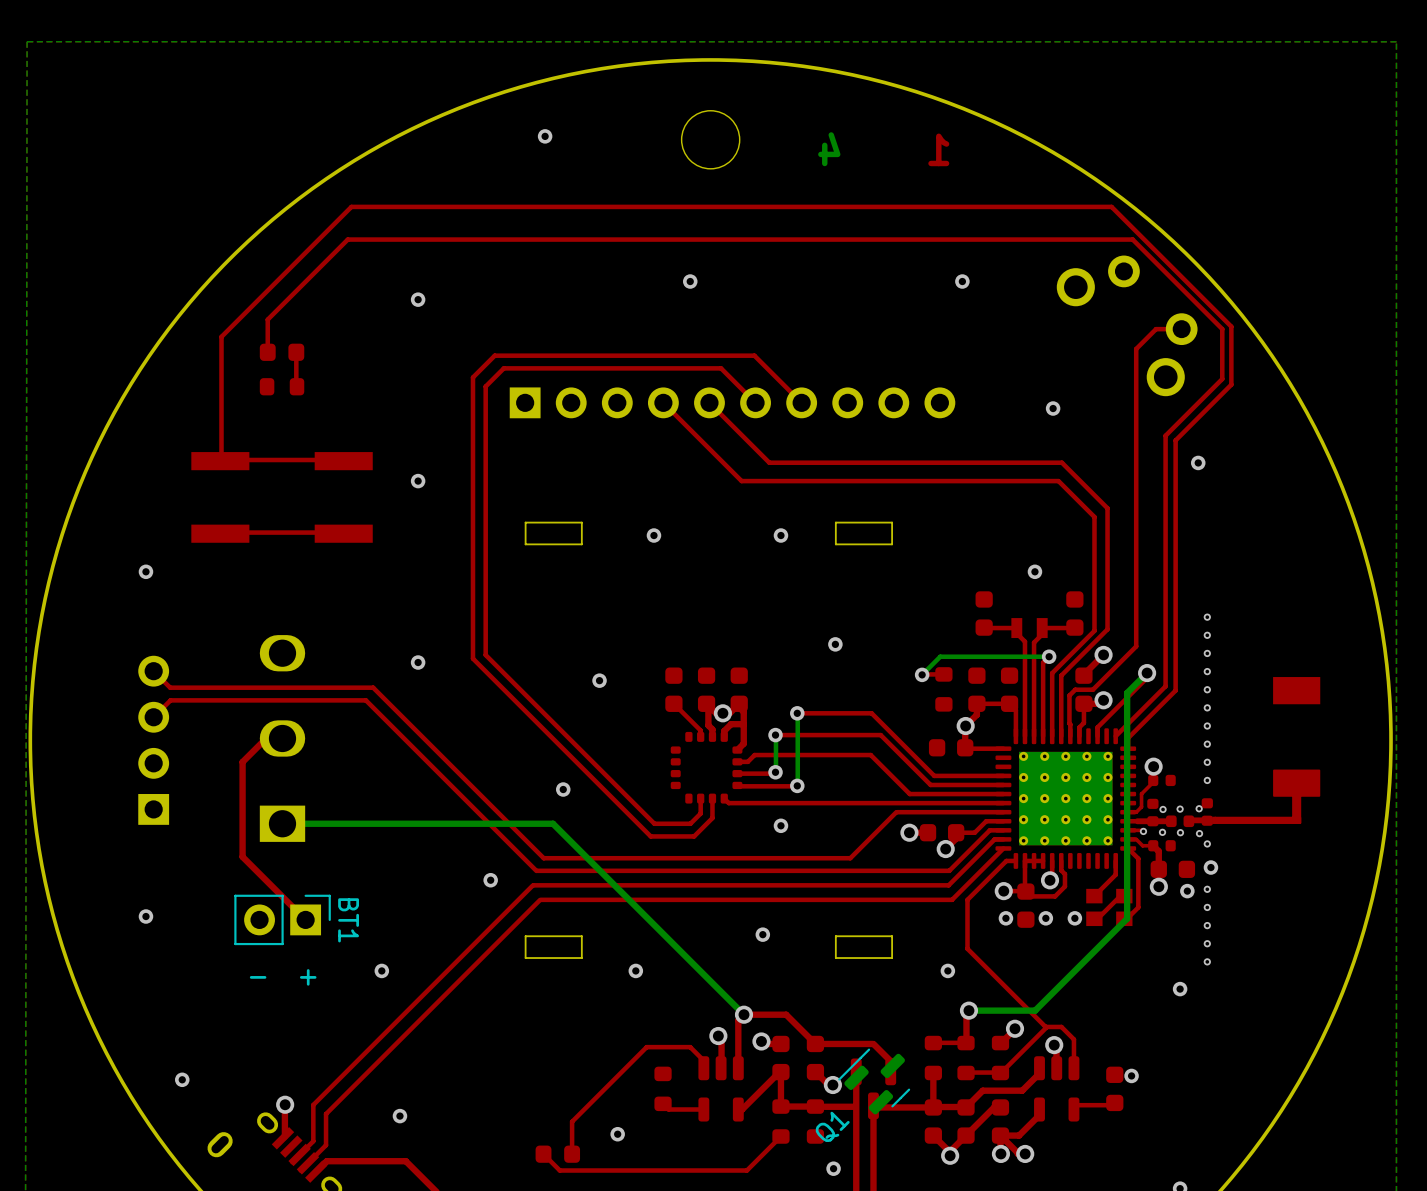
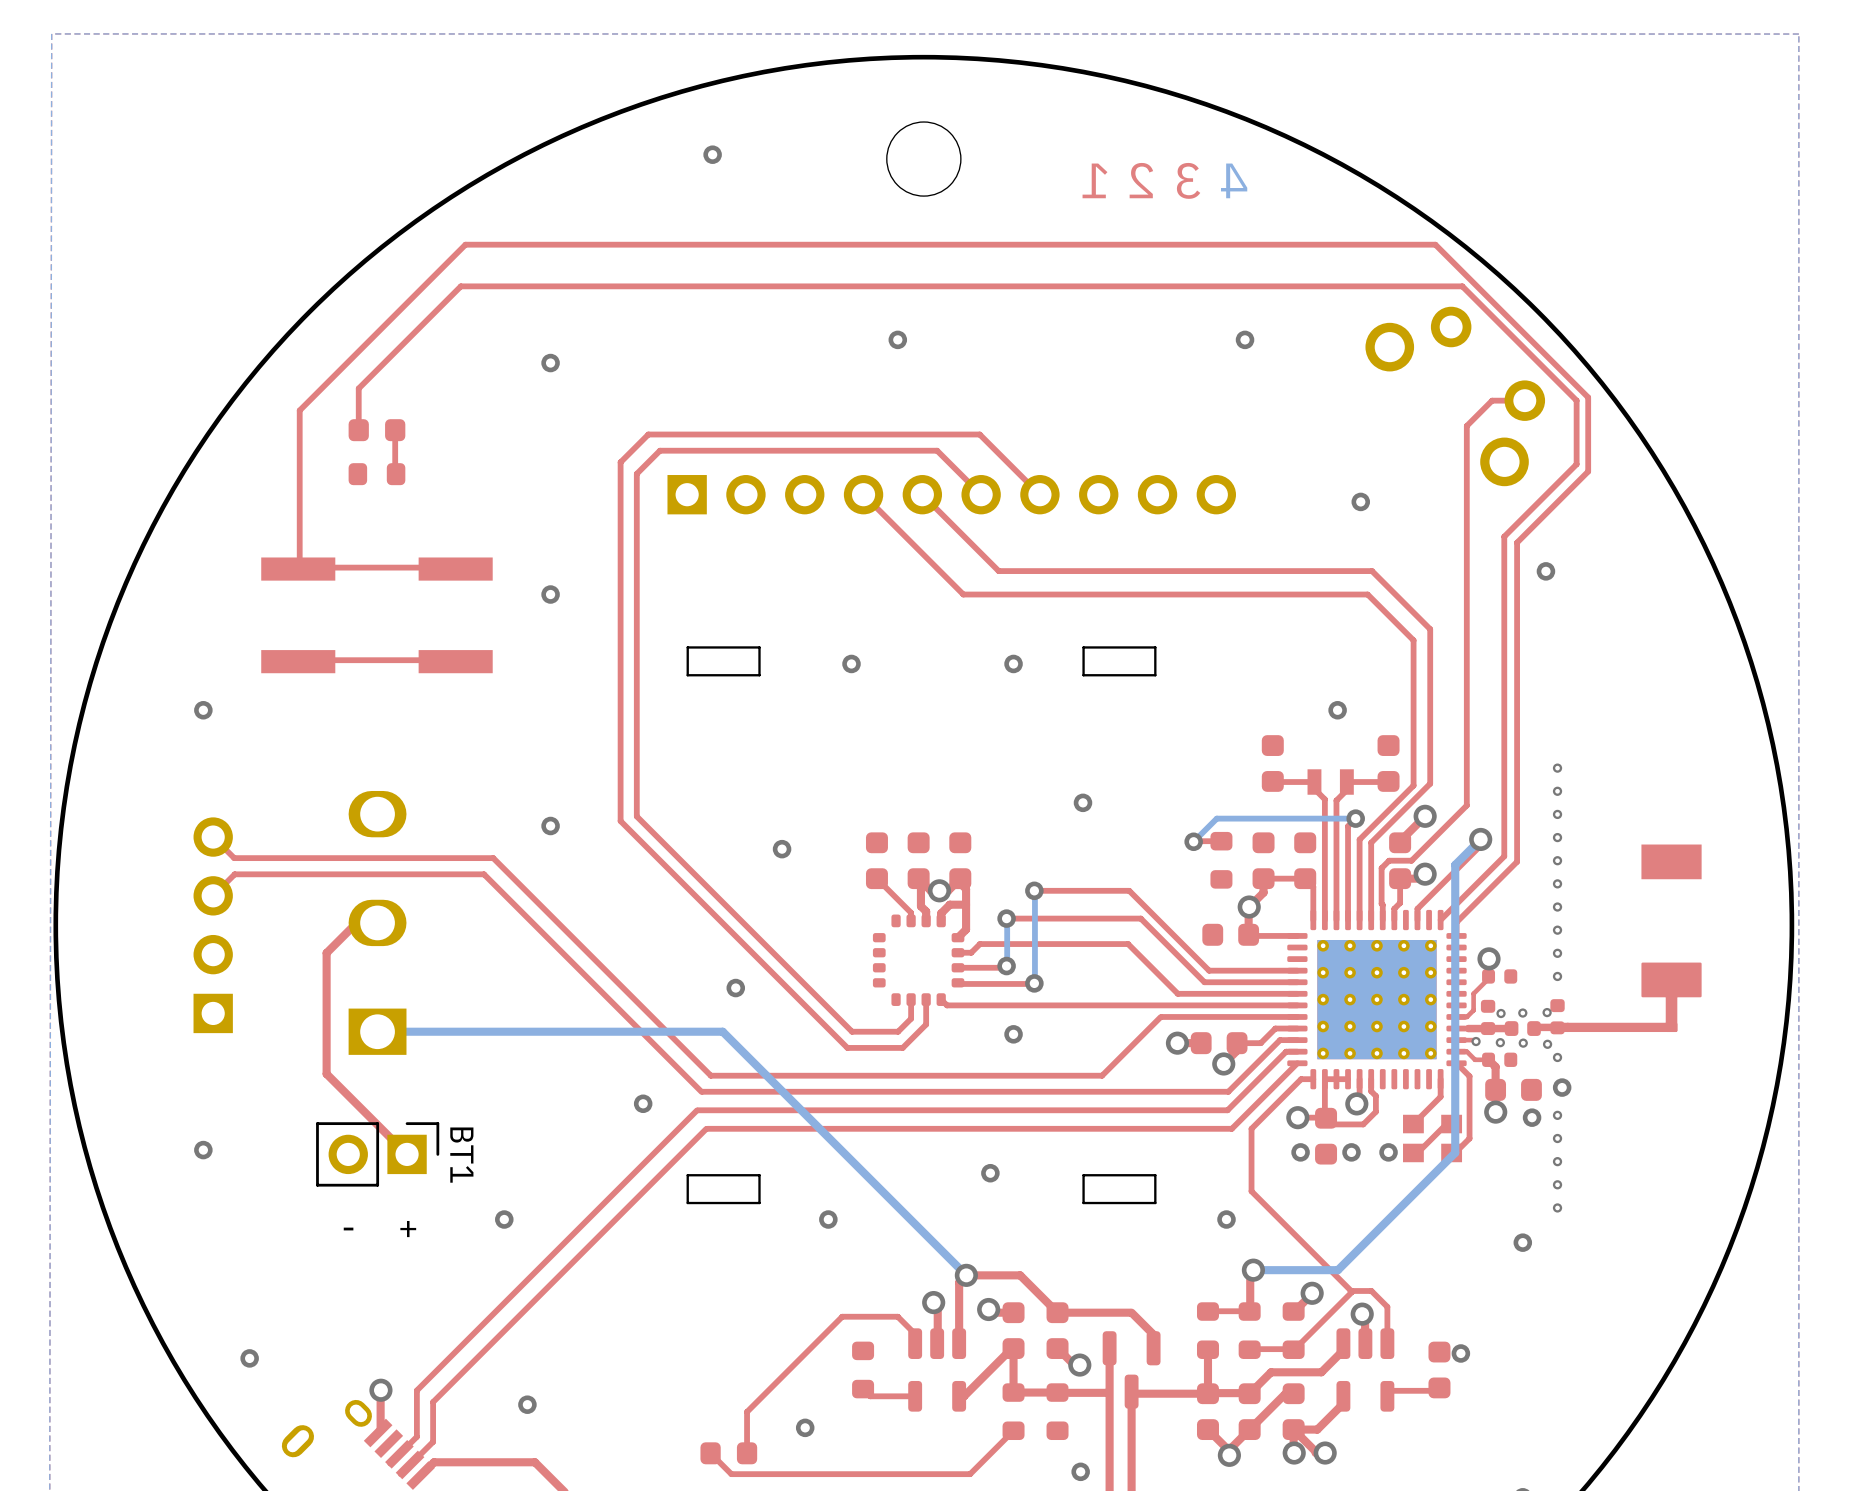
drawing shape: [818, 132, 950, 167] -> [1082, 162, 1248, 199]
Q1: (874, 1081) -> none

